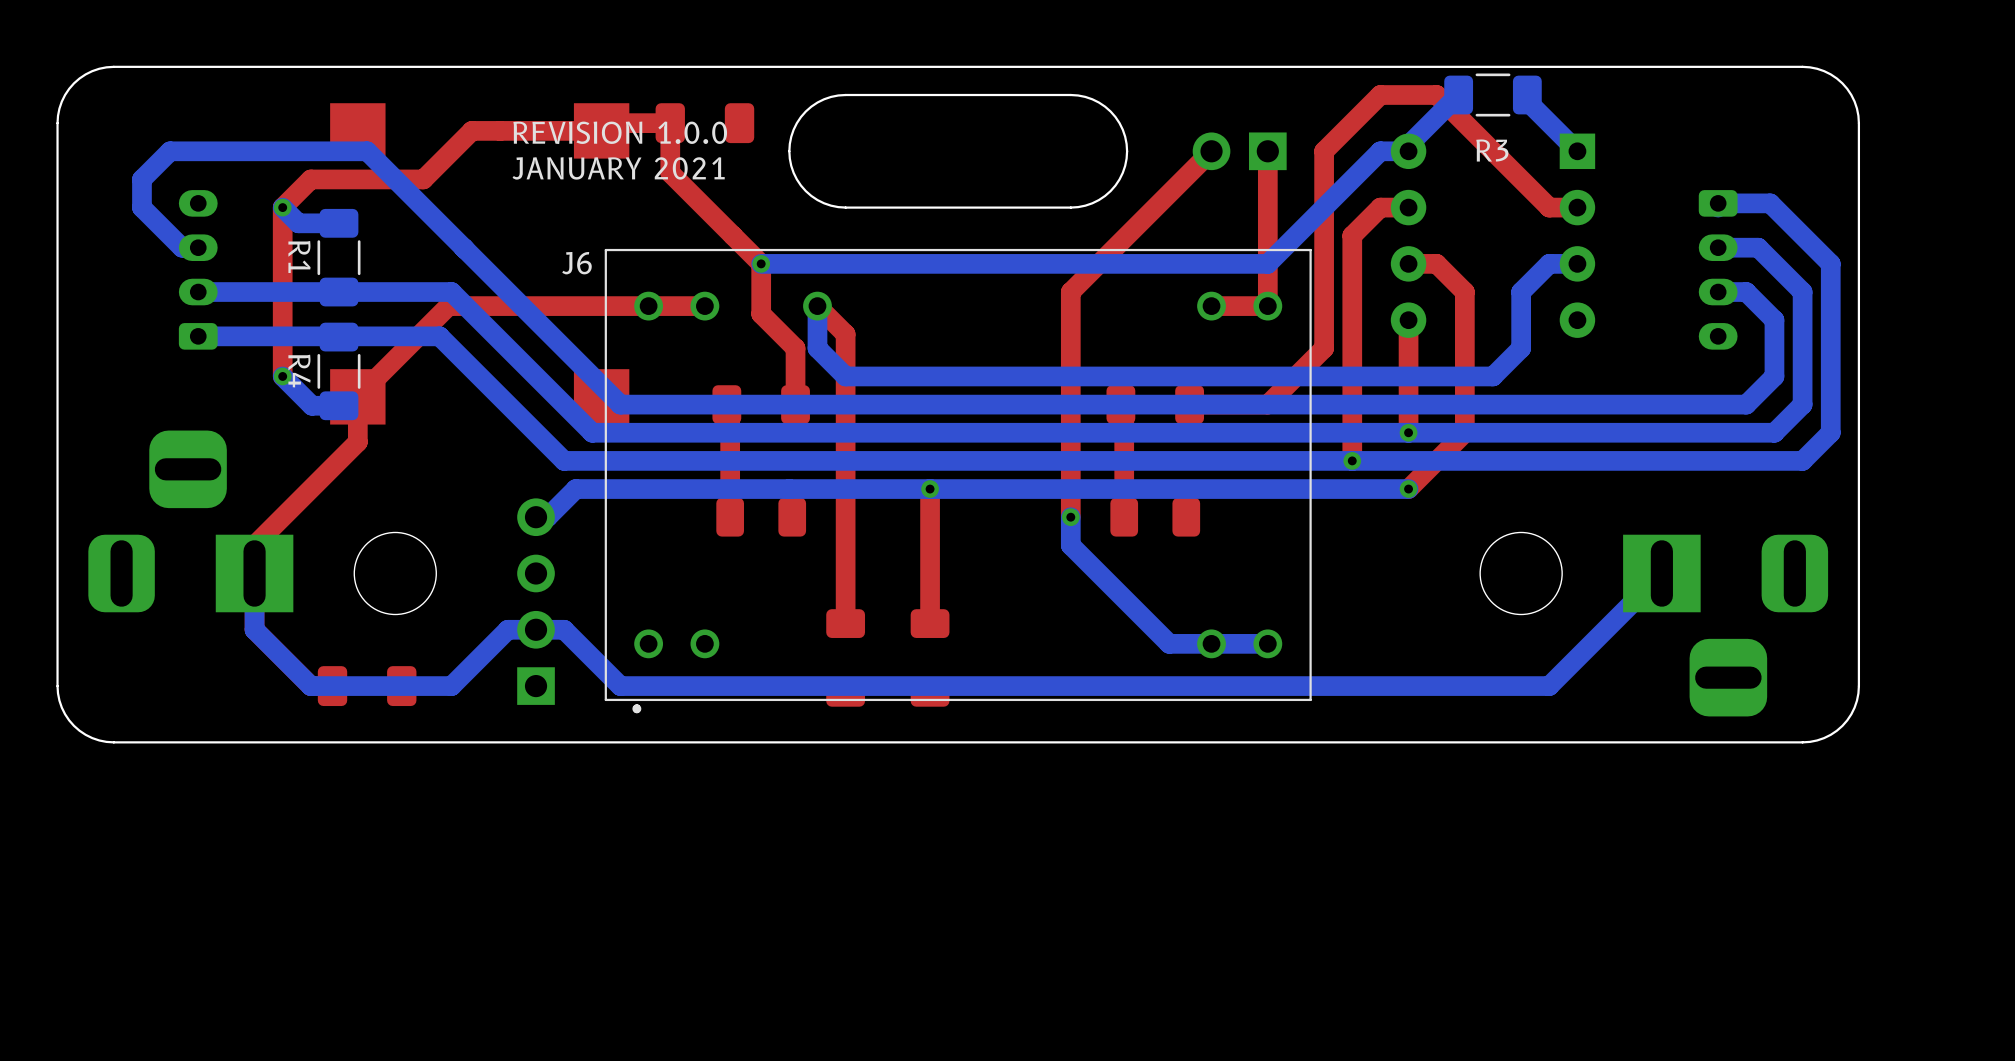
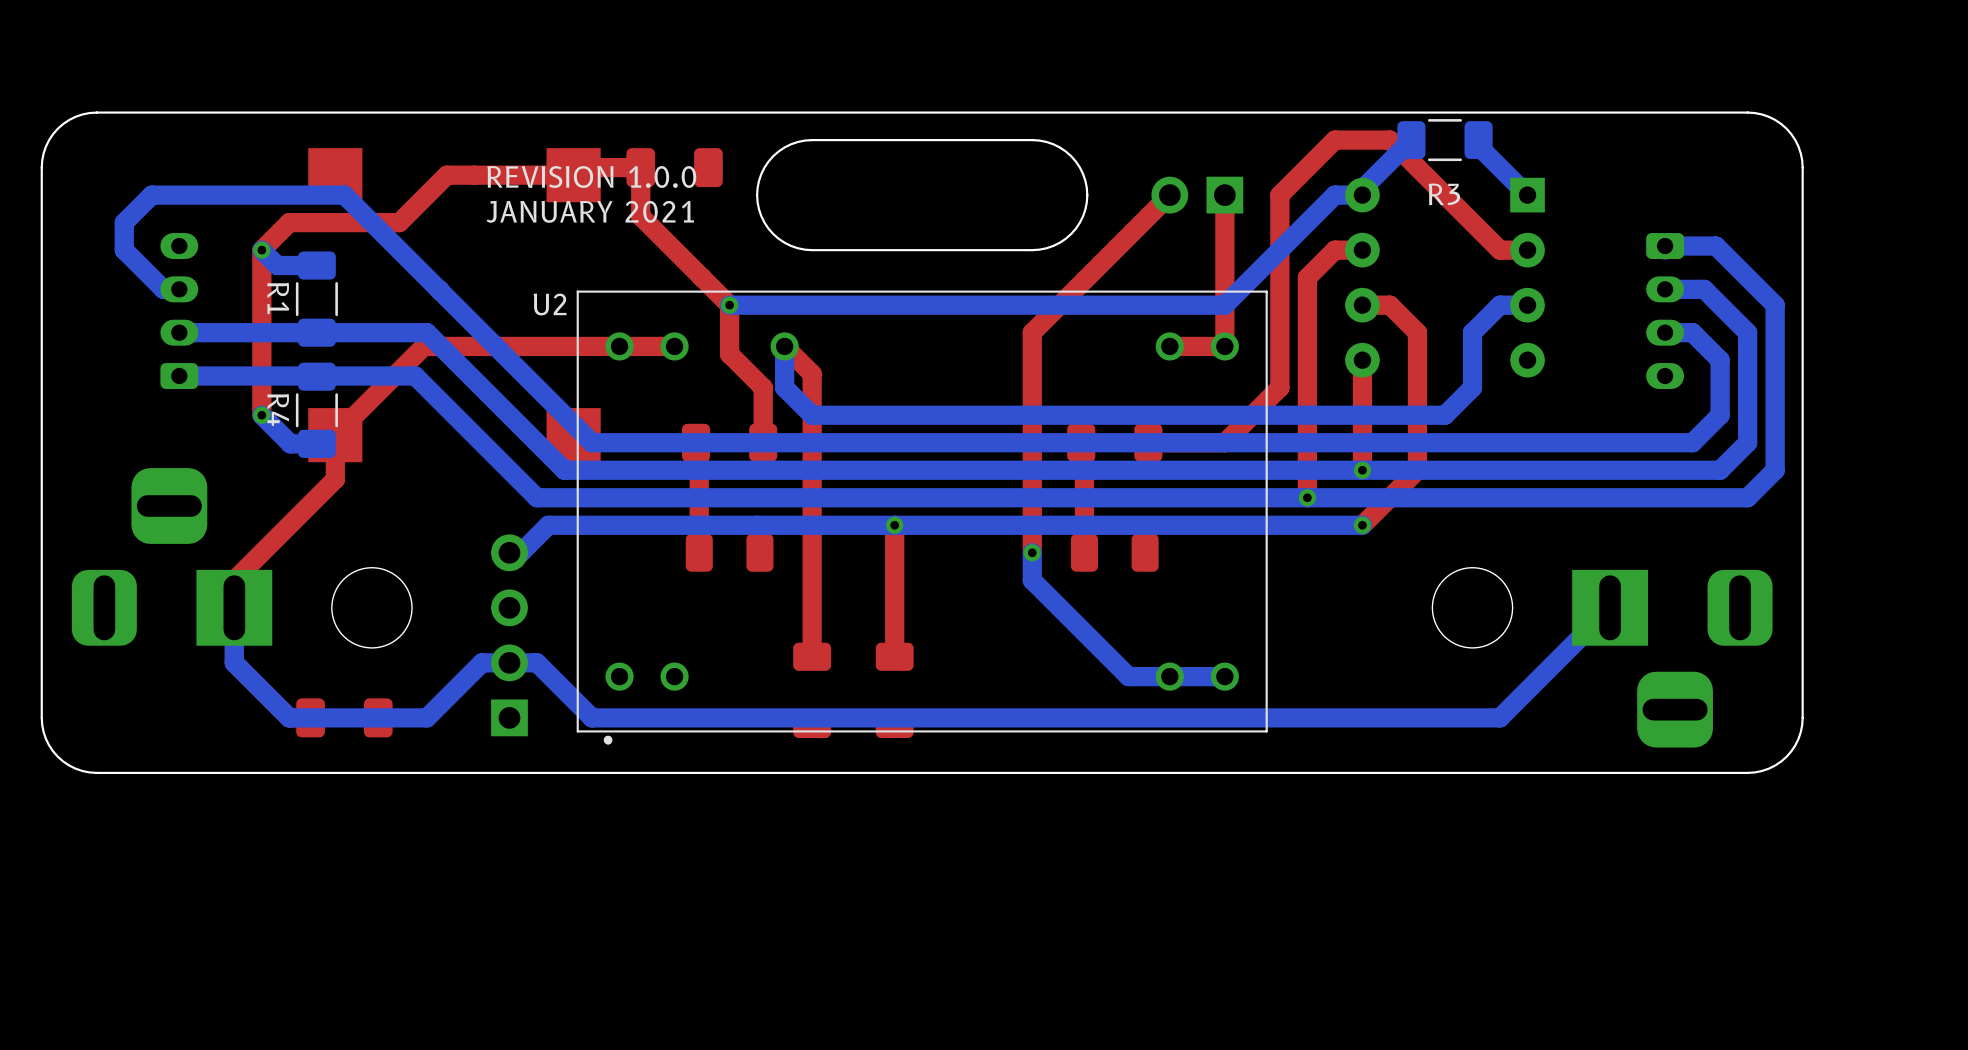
J6 name: J6 (576, 263) -> U2 (550, 304)

